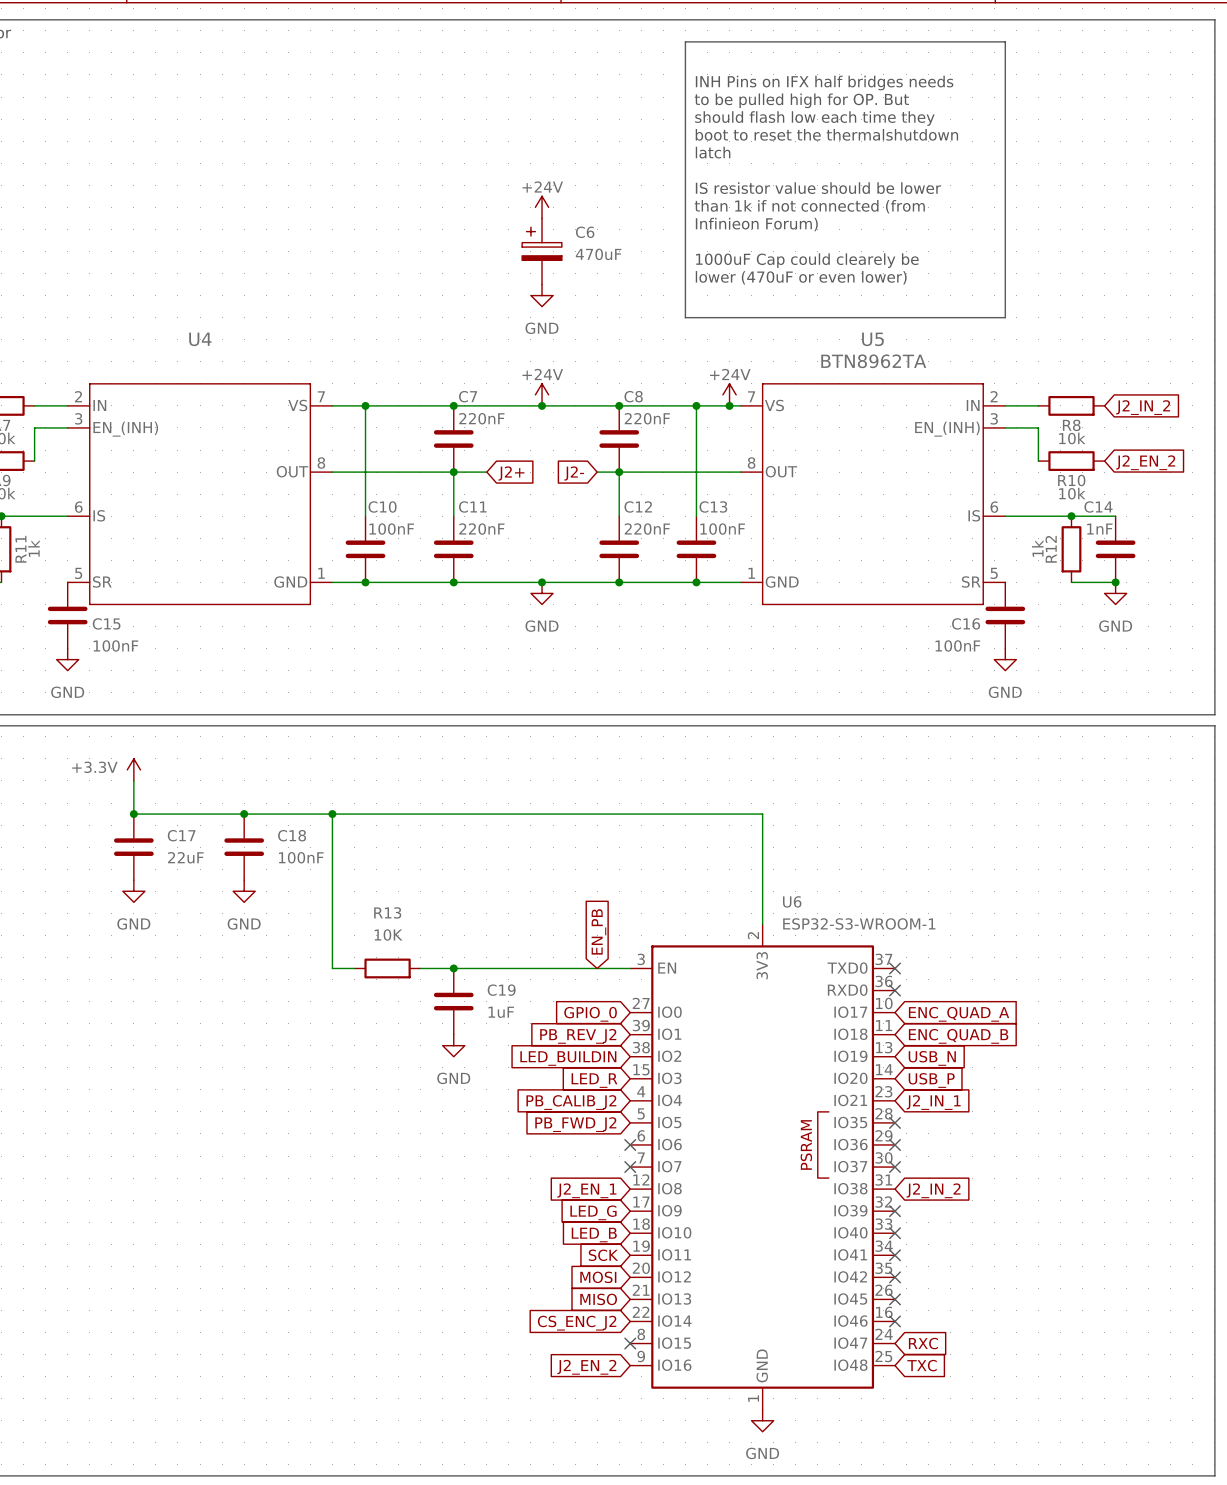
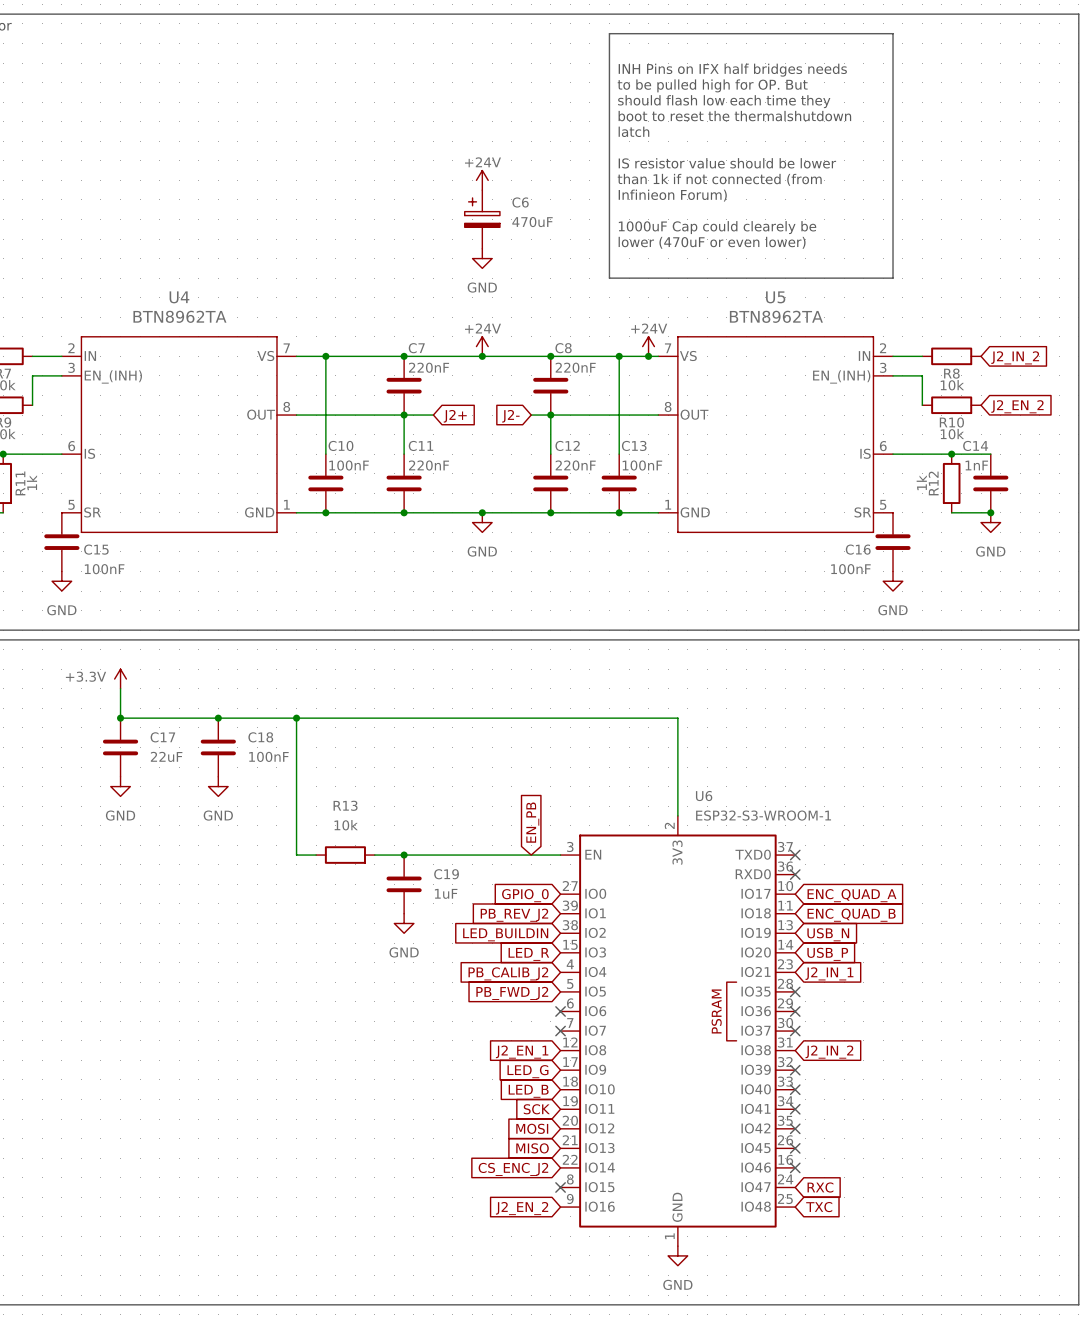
U4 value: none -> BTN8962TA (179, 316)
R13 value: 10K (388, 934) -> 10k (346, 825)

